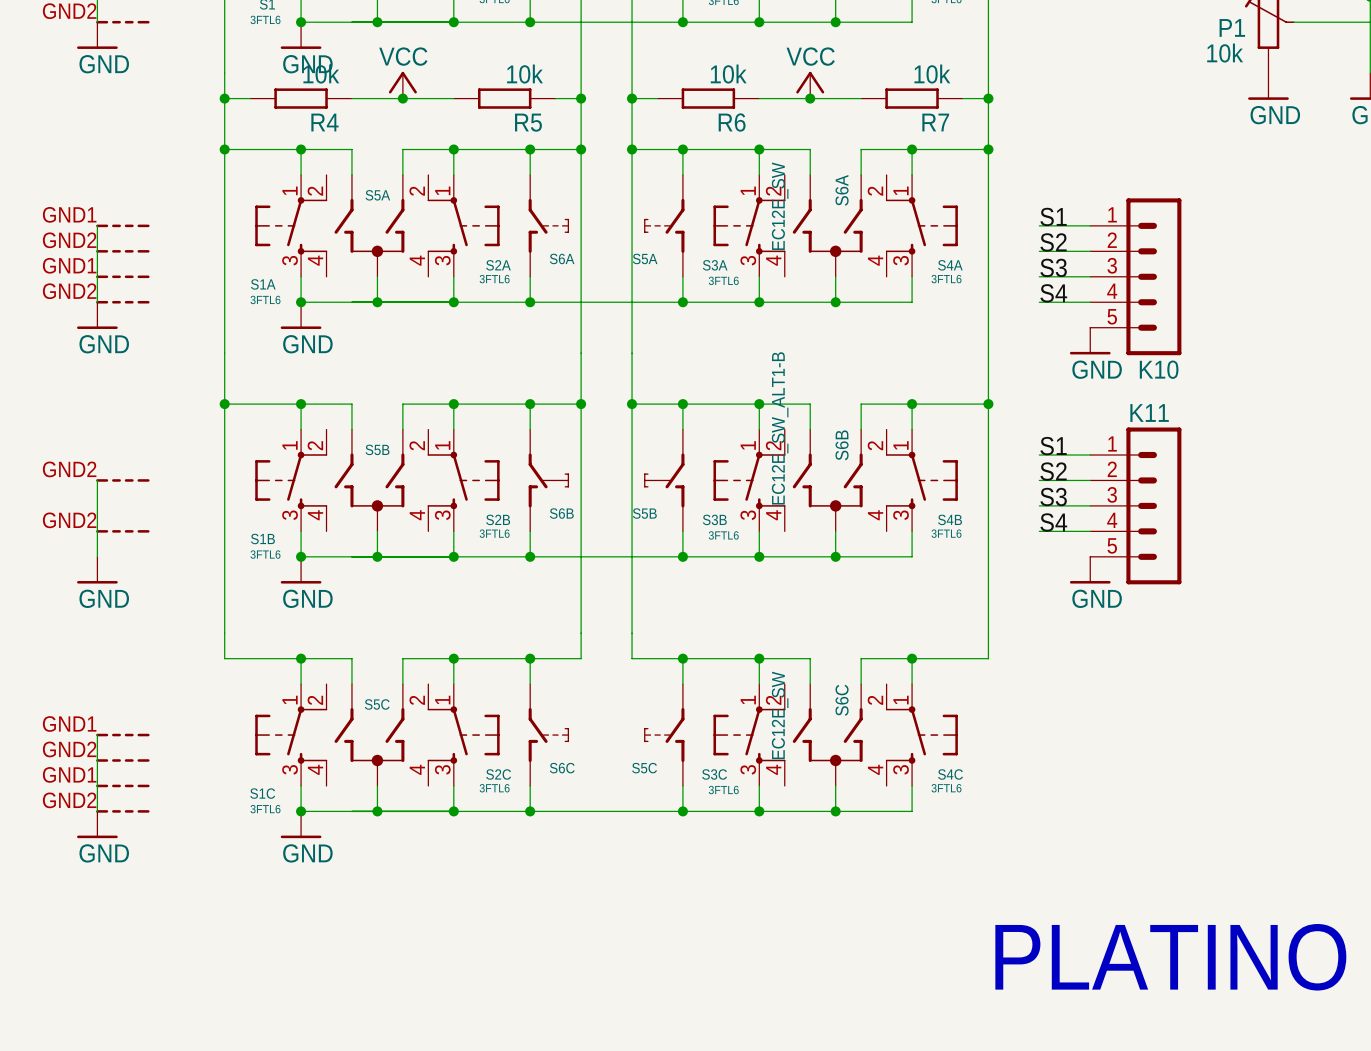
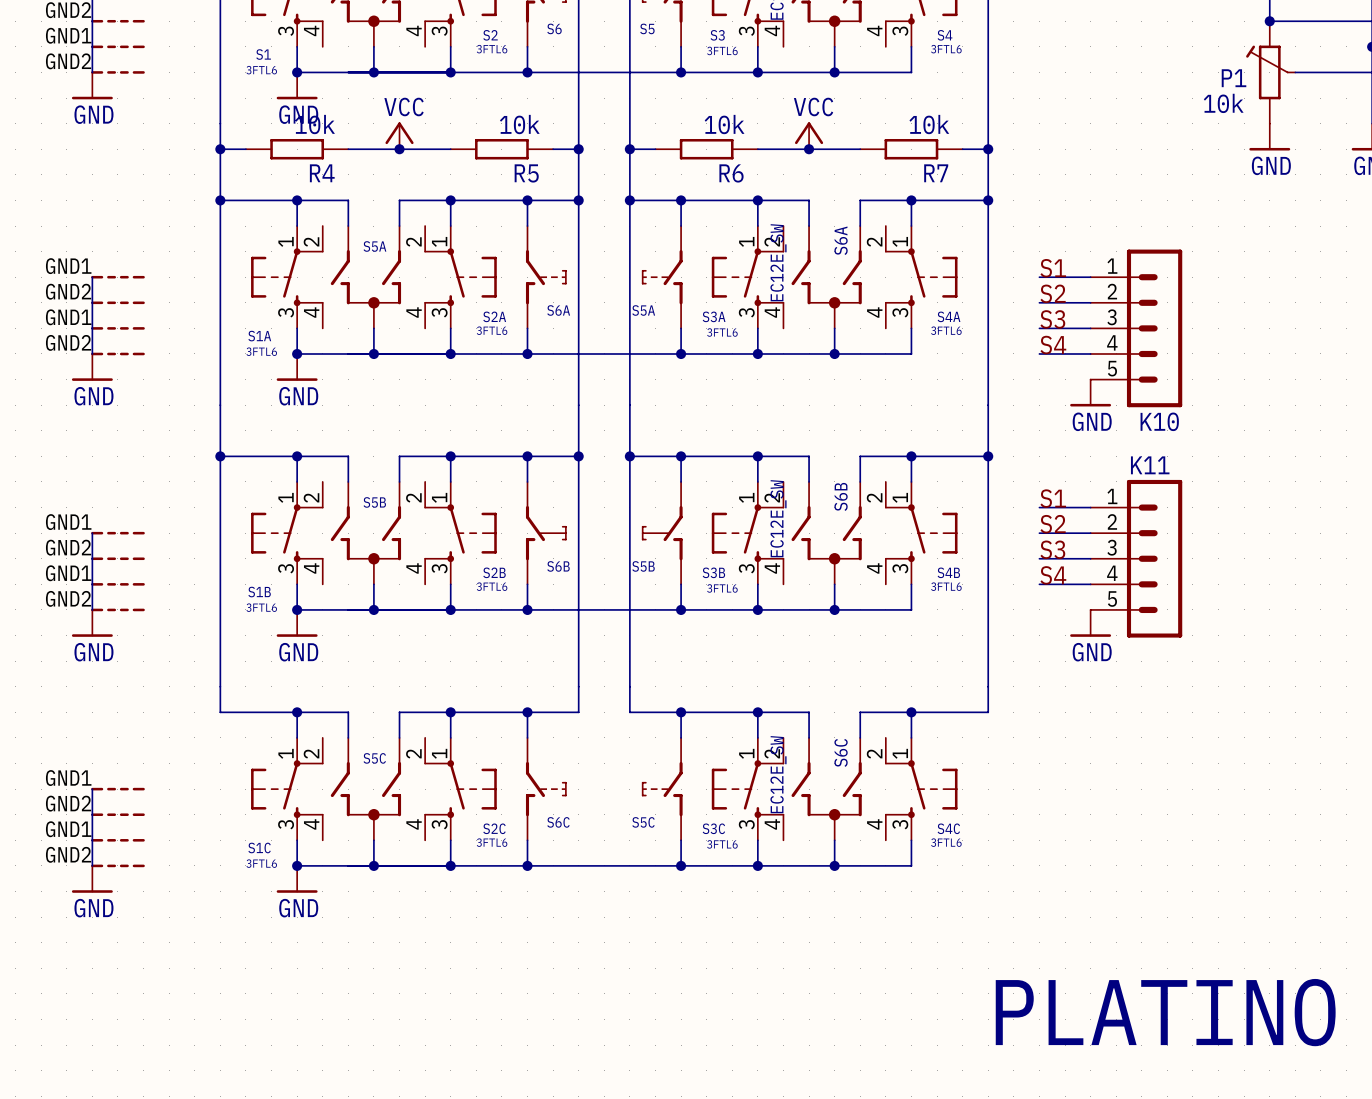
S6B value: EC12E_SW_ALT1-B (780, 428) -> EC12E_SW (778, 518)
part pin number: GND2 (69, 469) -> GND1 (68, 522)
part: none -> (117, 558)
part pin number: GND2 (69, 520) -> GND1 (68, 573)
part: none -> (117, 609)

